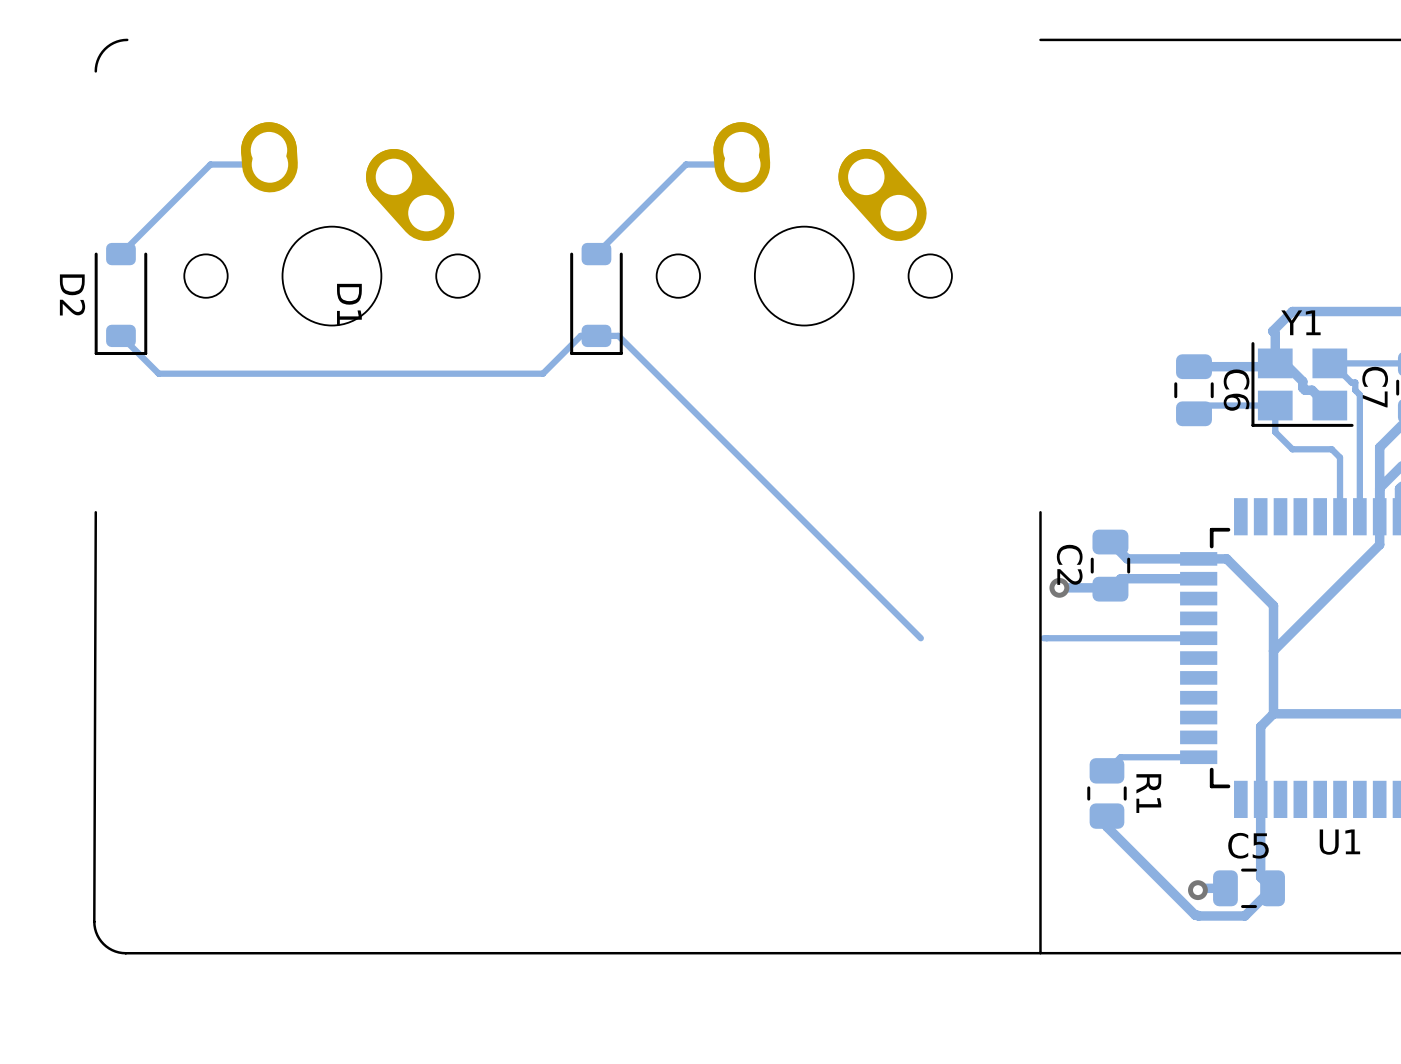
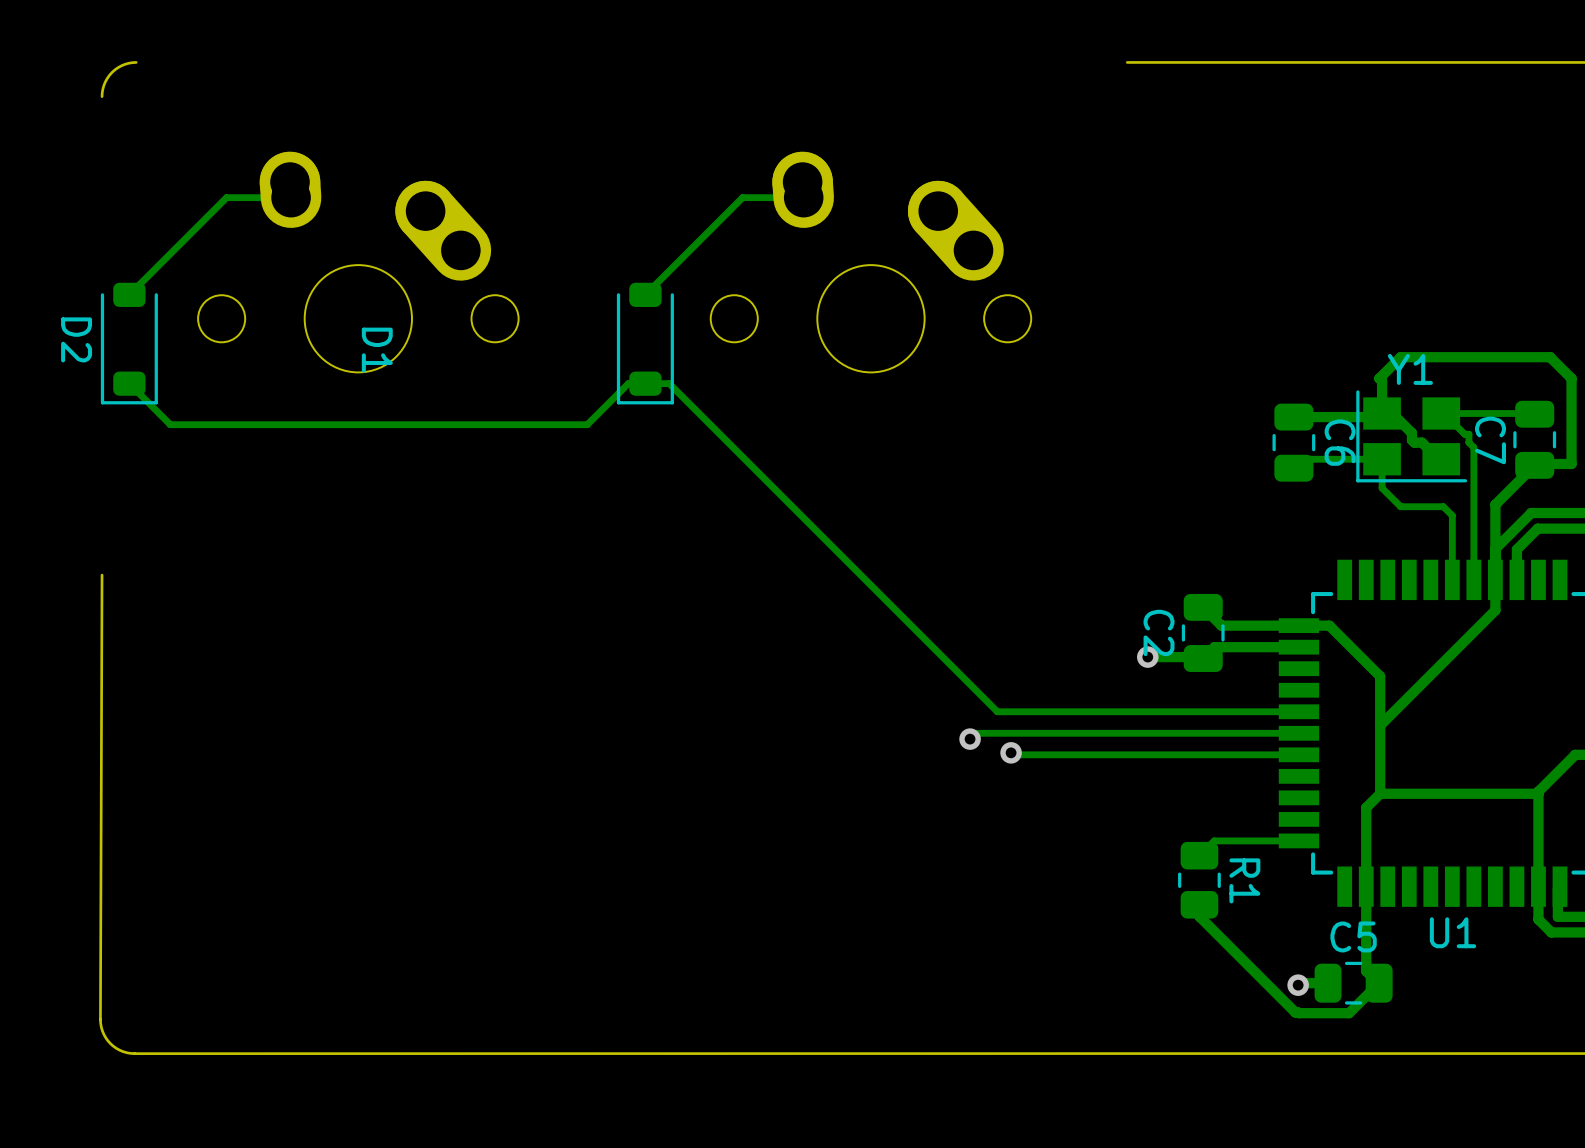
board edge: (1040, 512) (1040, 953) -> none
track: none -> (1130, 711) (997, 711)
track: none -> (1298, 733) (975, 733) (970, 739)
via: none -> (970, 739)
track: none -> (1011, 752) (1013, 754) (1298, 754)
via: none -> (1011, 752)

